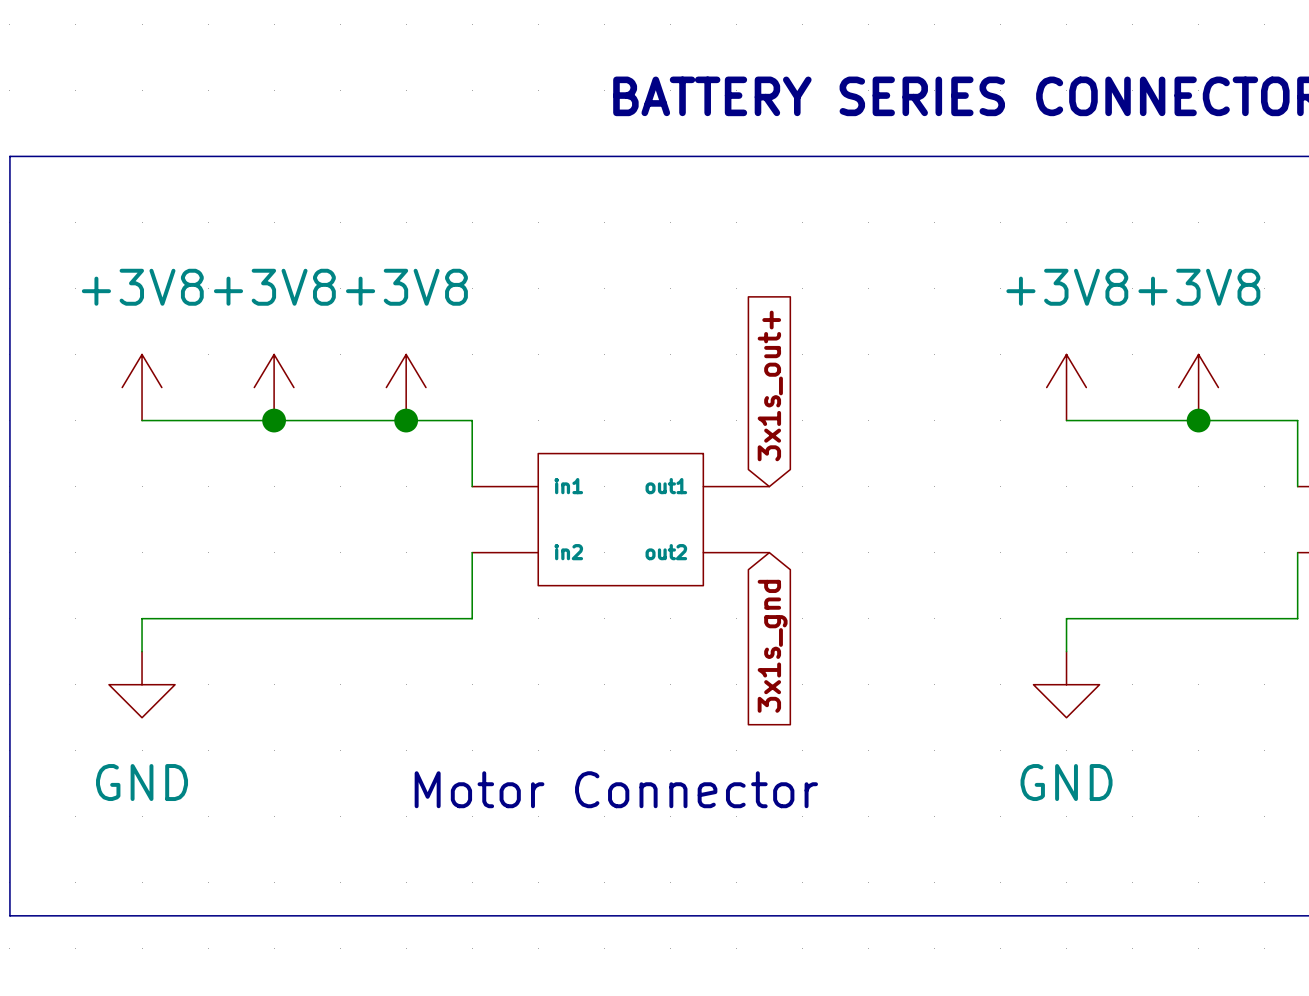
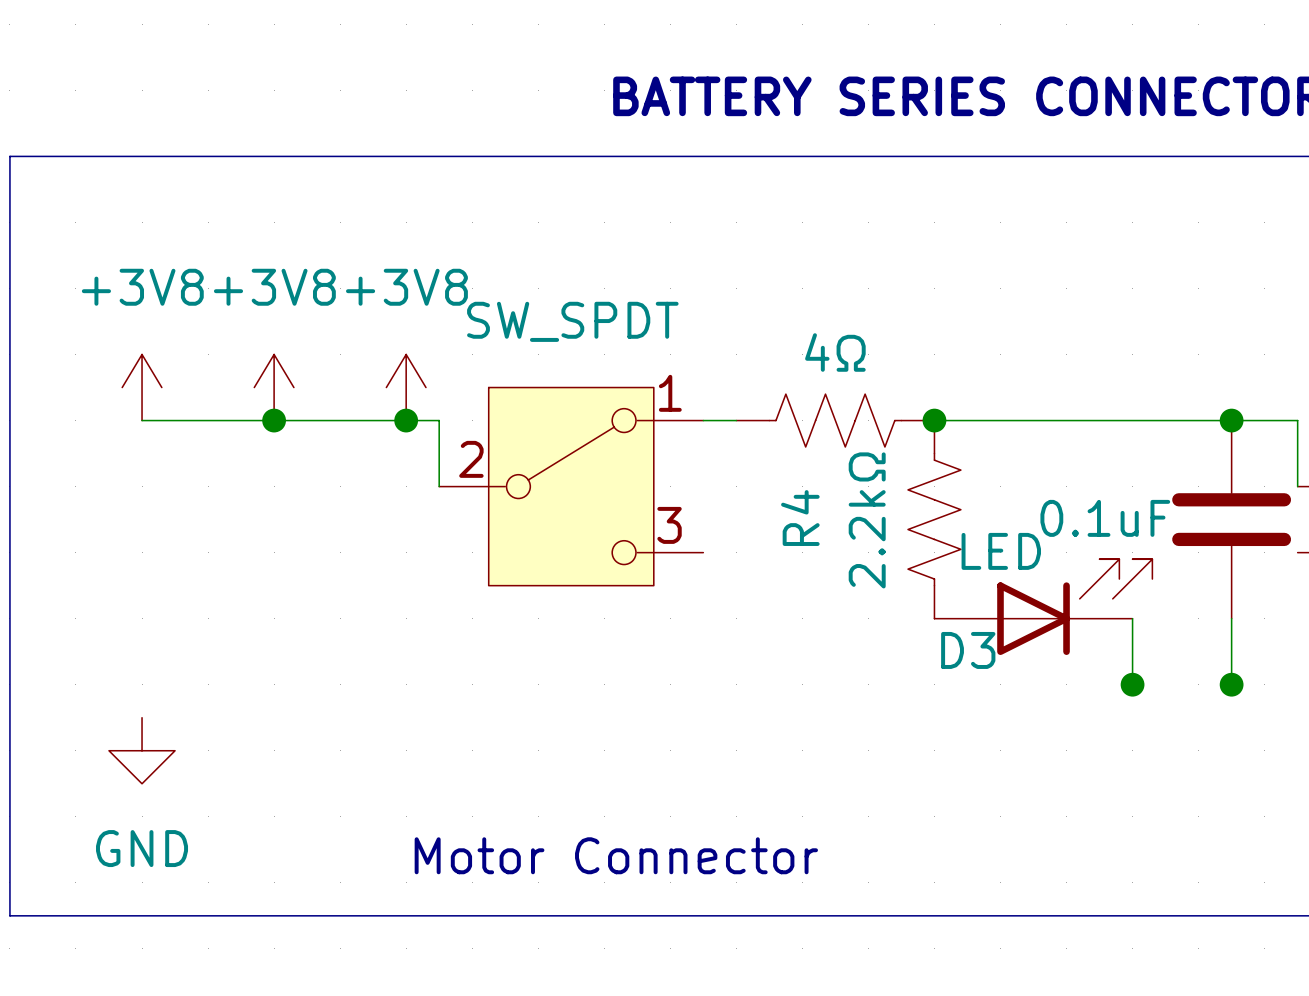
global label: 3x1s_out+ (770, 385) -> none
power symbol: +3V8 (1066, 387) -> none
power symbol: +3V8 (1198, 387) -> none
wire: (439, 420) (472, 420) (472, 486) -> (439, 420) (439, 486)
wire: none -> (703, 420) (736, 420)
part: none -> 4Ω (835, 420)
wire: none -> (934, 420) (1066, 420)
junction: none -> (934, 420)
junction position: (1198, 420) -> (1231, 420)
part: none -> SW_SPDT (571, 486)
part: (620, 519) -> none
R4: none -> 2.2kΩ (934, 519)
part: none -> 0.1uF (1231, 519)
wire: (472, 552) (472, 618) (142, 618) (142, 651) -> none
wire: (1297, 552) (1297, 618) (1066, 618) (1066, 651) -> none
D3: none -> LED (1043, 607)
wire: none -> (1132, 618) (1132, 684)
wire: none -> (1231, 618) (1231, 684)
global label: 3x1s_gnd (772, 646) -> none
power symbol position: GND (142, 684) -> GND (142, 750)
power symbol: GND (1066, 684) -> none
junction: none -> (1132, 684)
junction: none -> (1231, 684)
text position: Motor Connector (616, 789) -> Motor Connector (616, 855)

